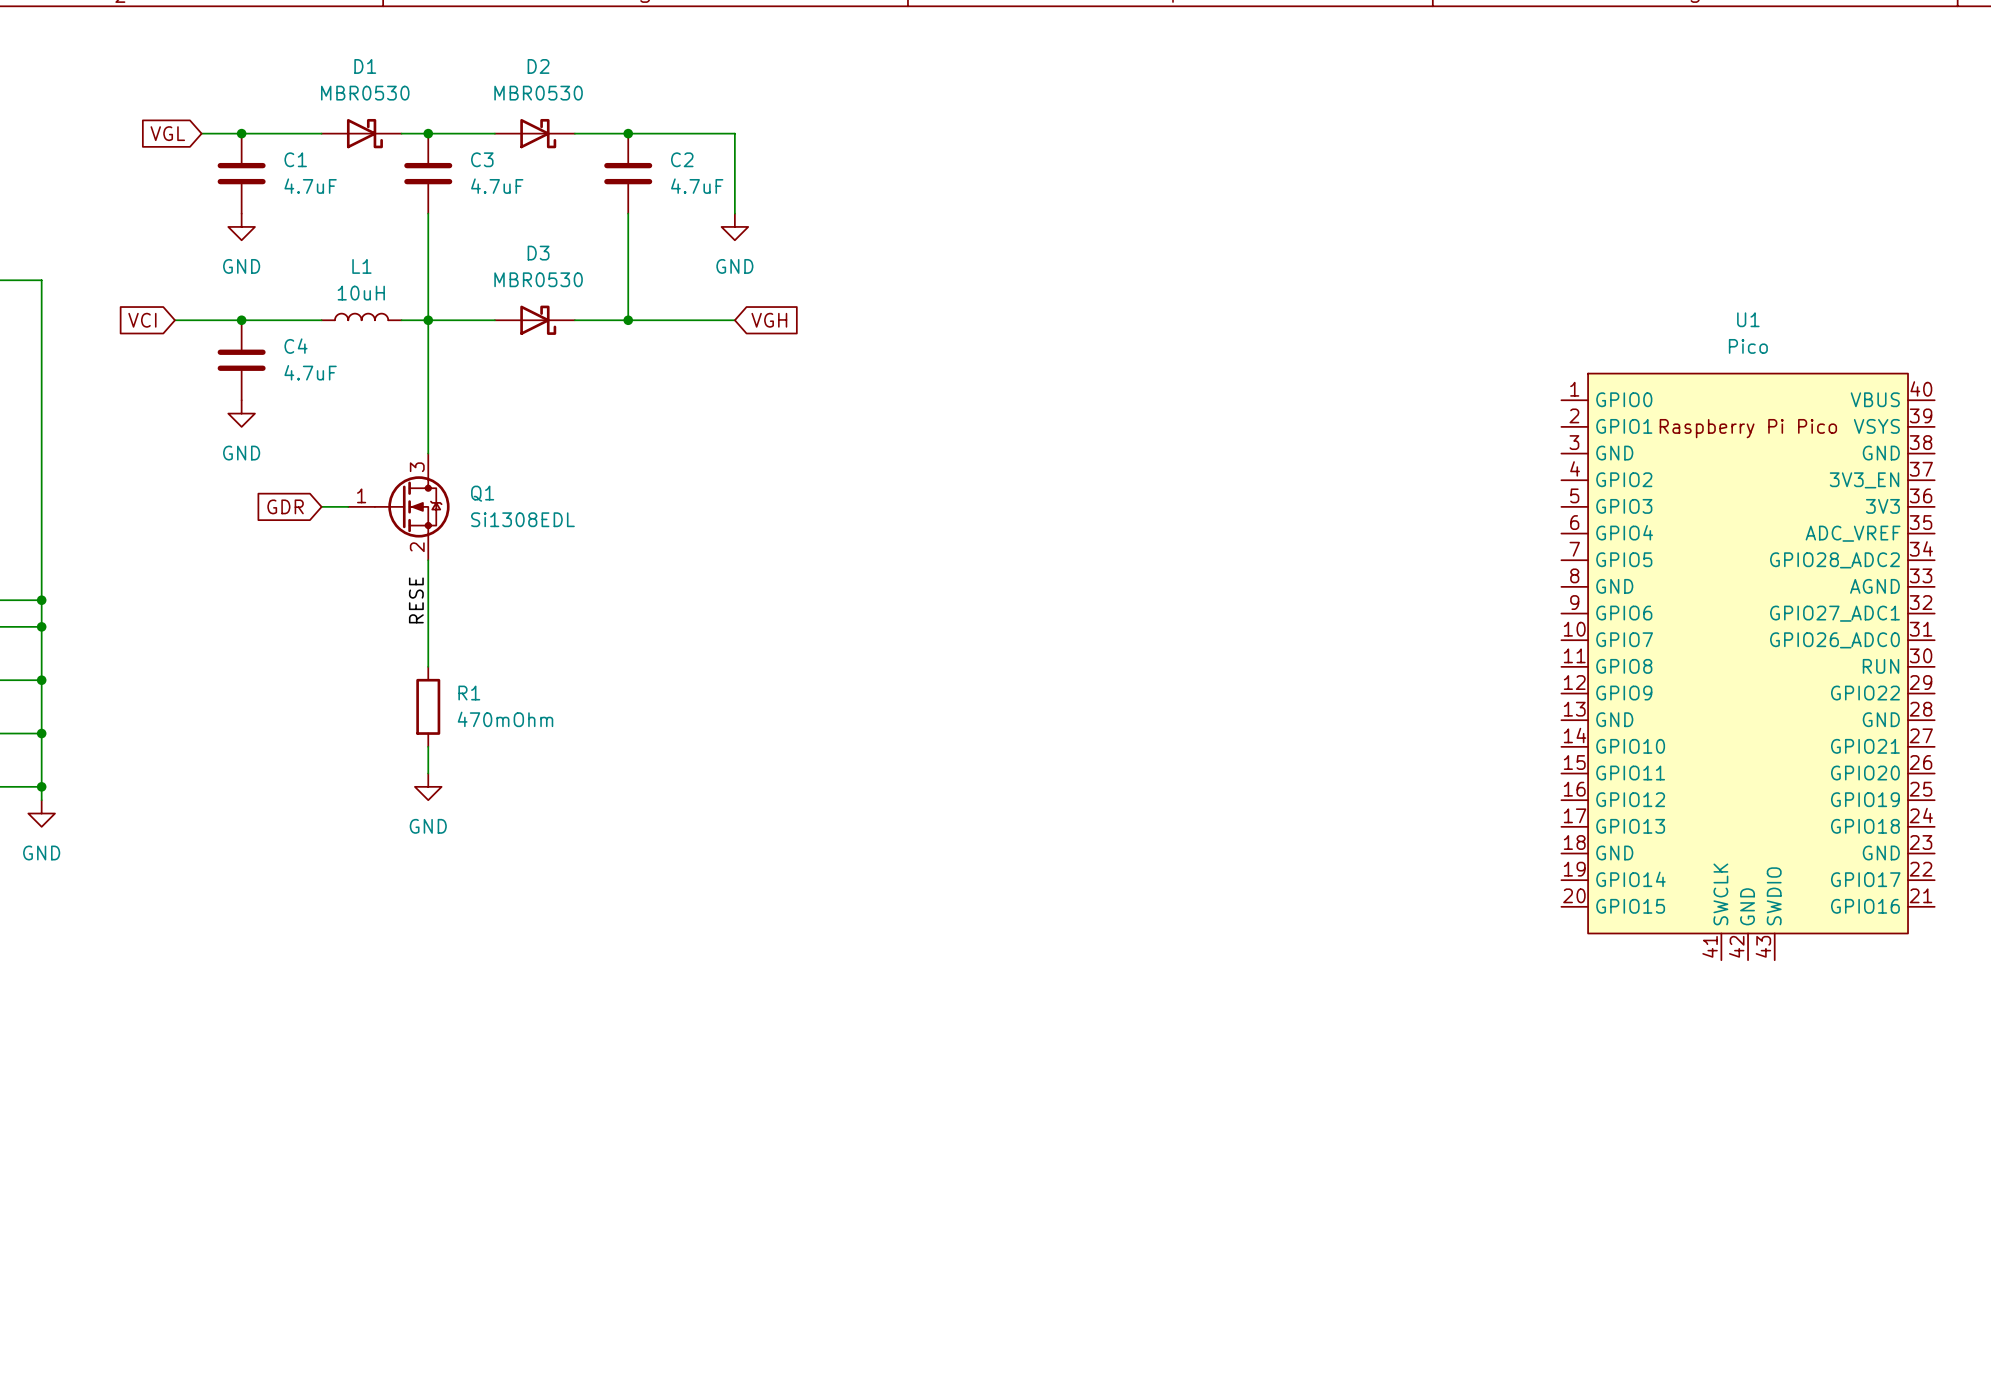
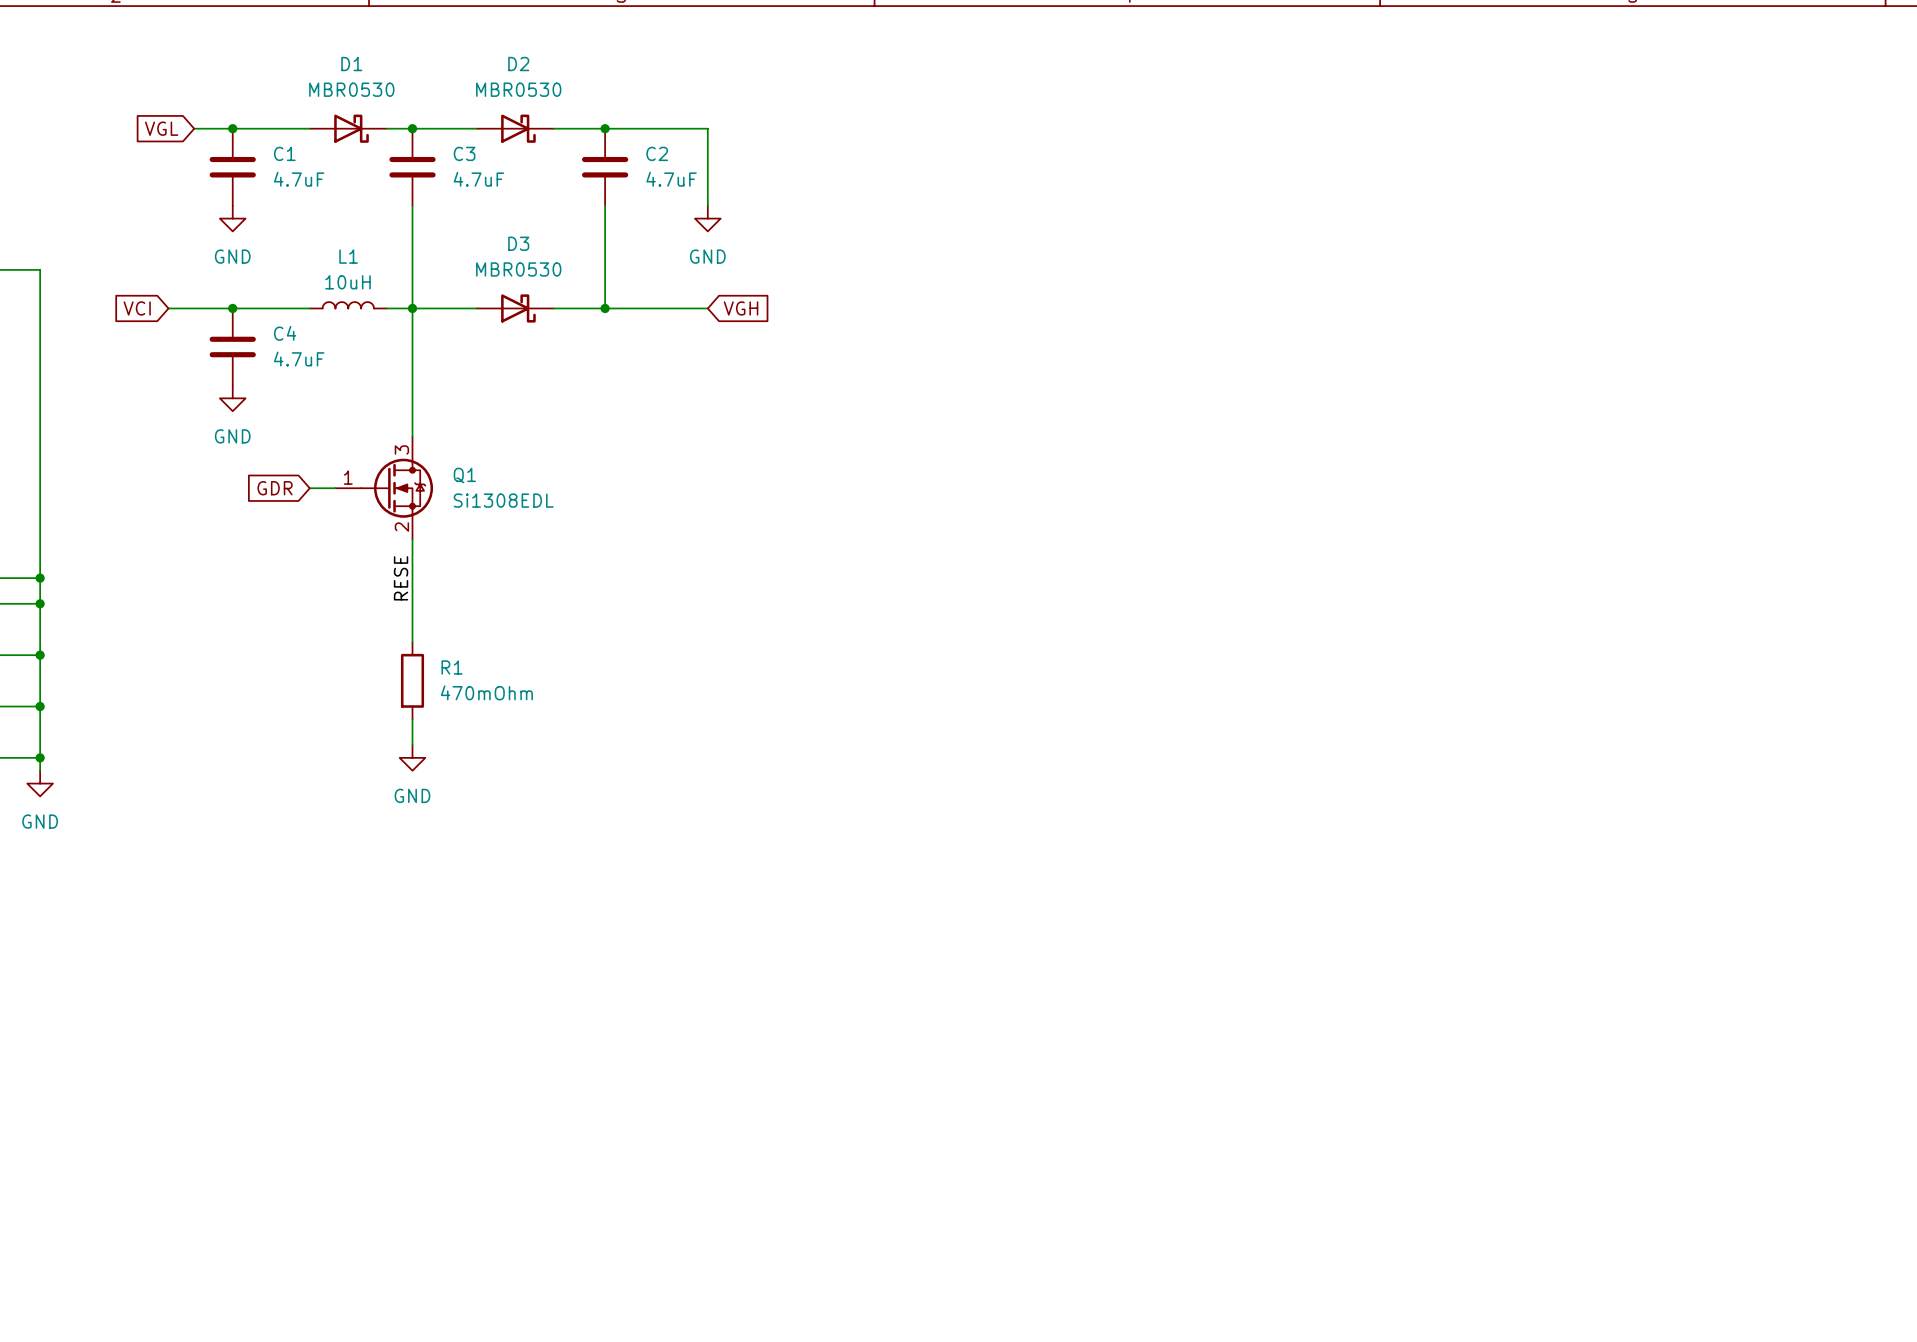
U1: Pico (1748, 666) -> none

